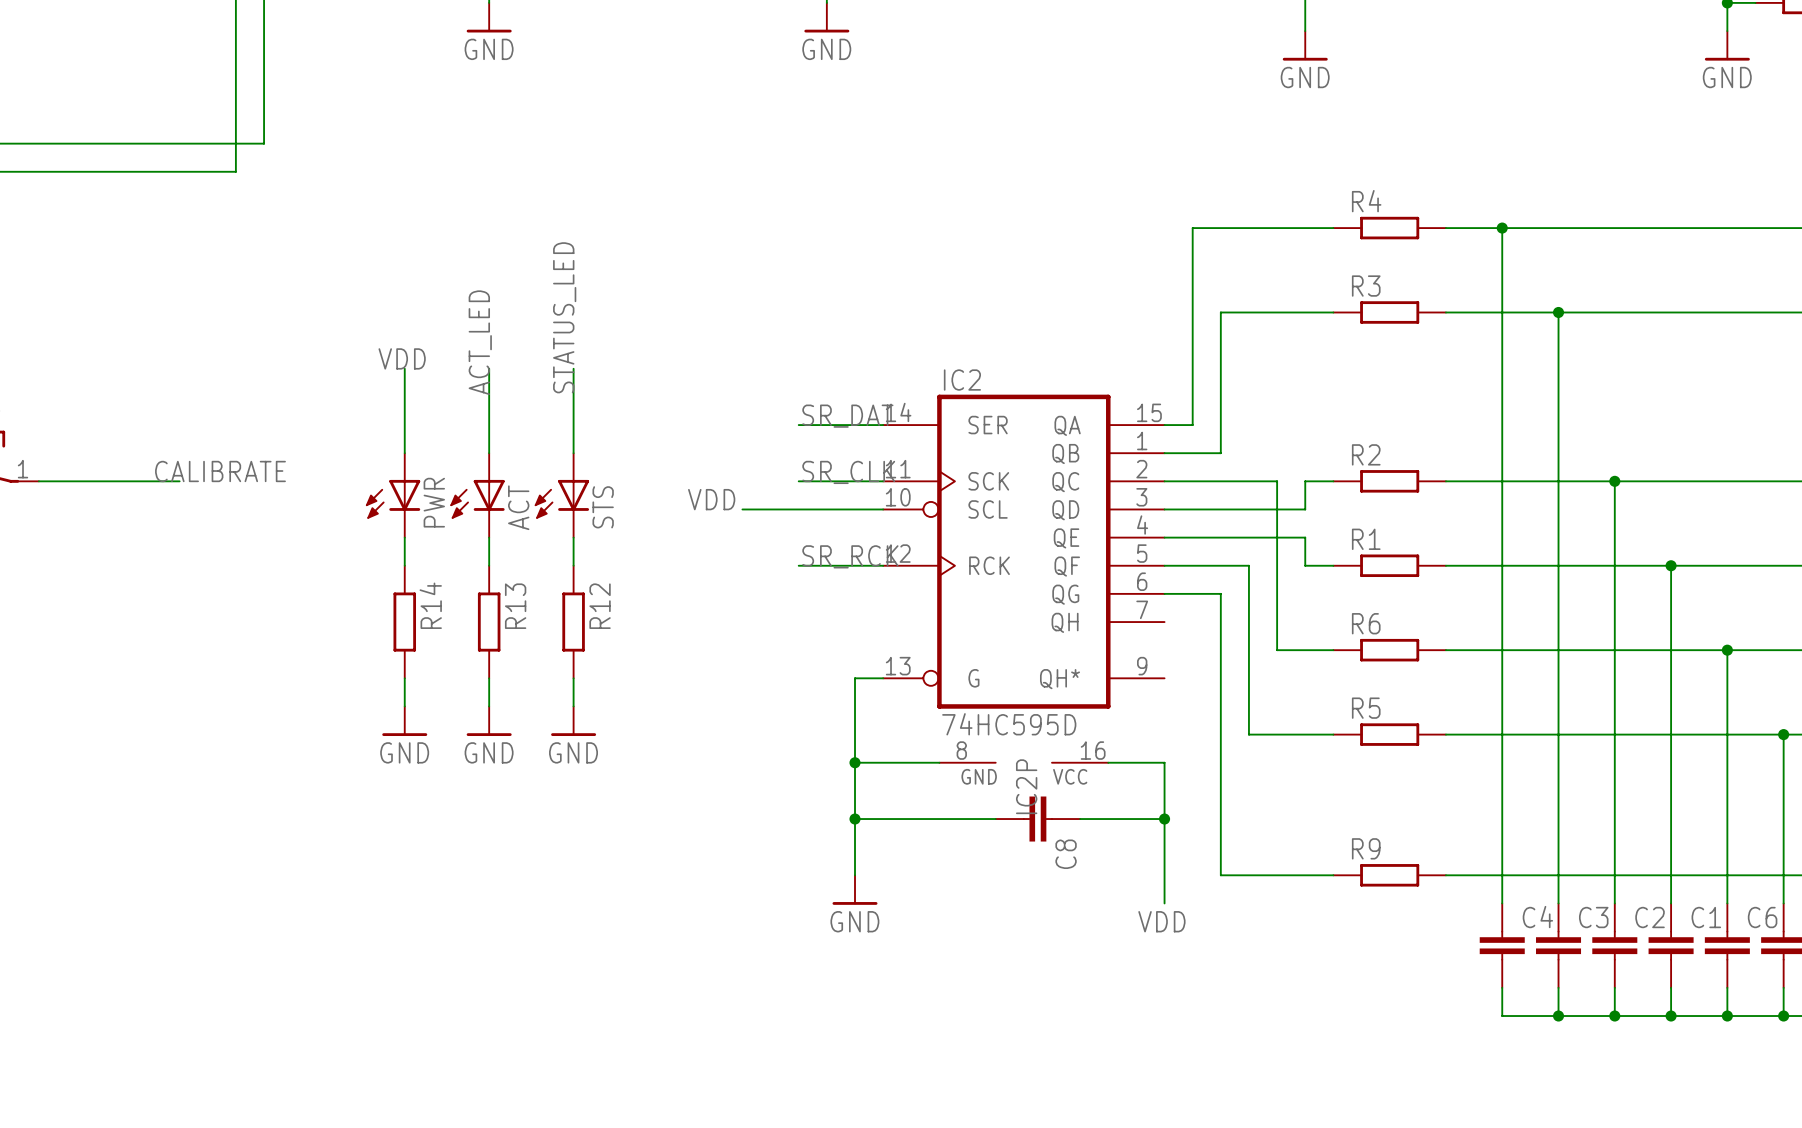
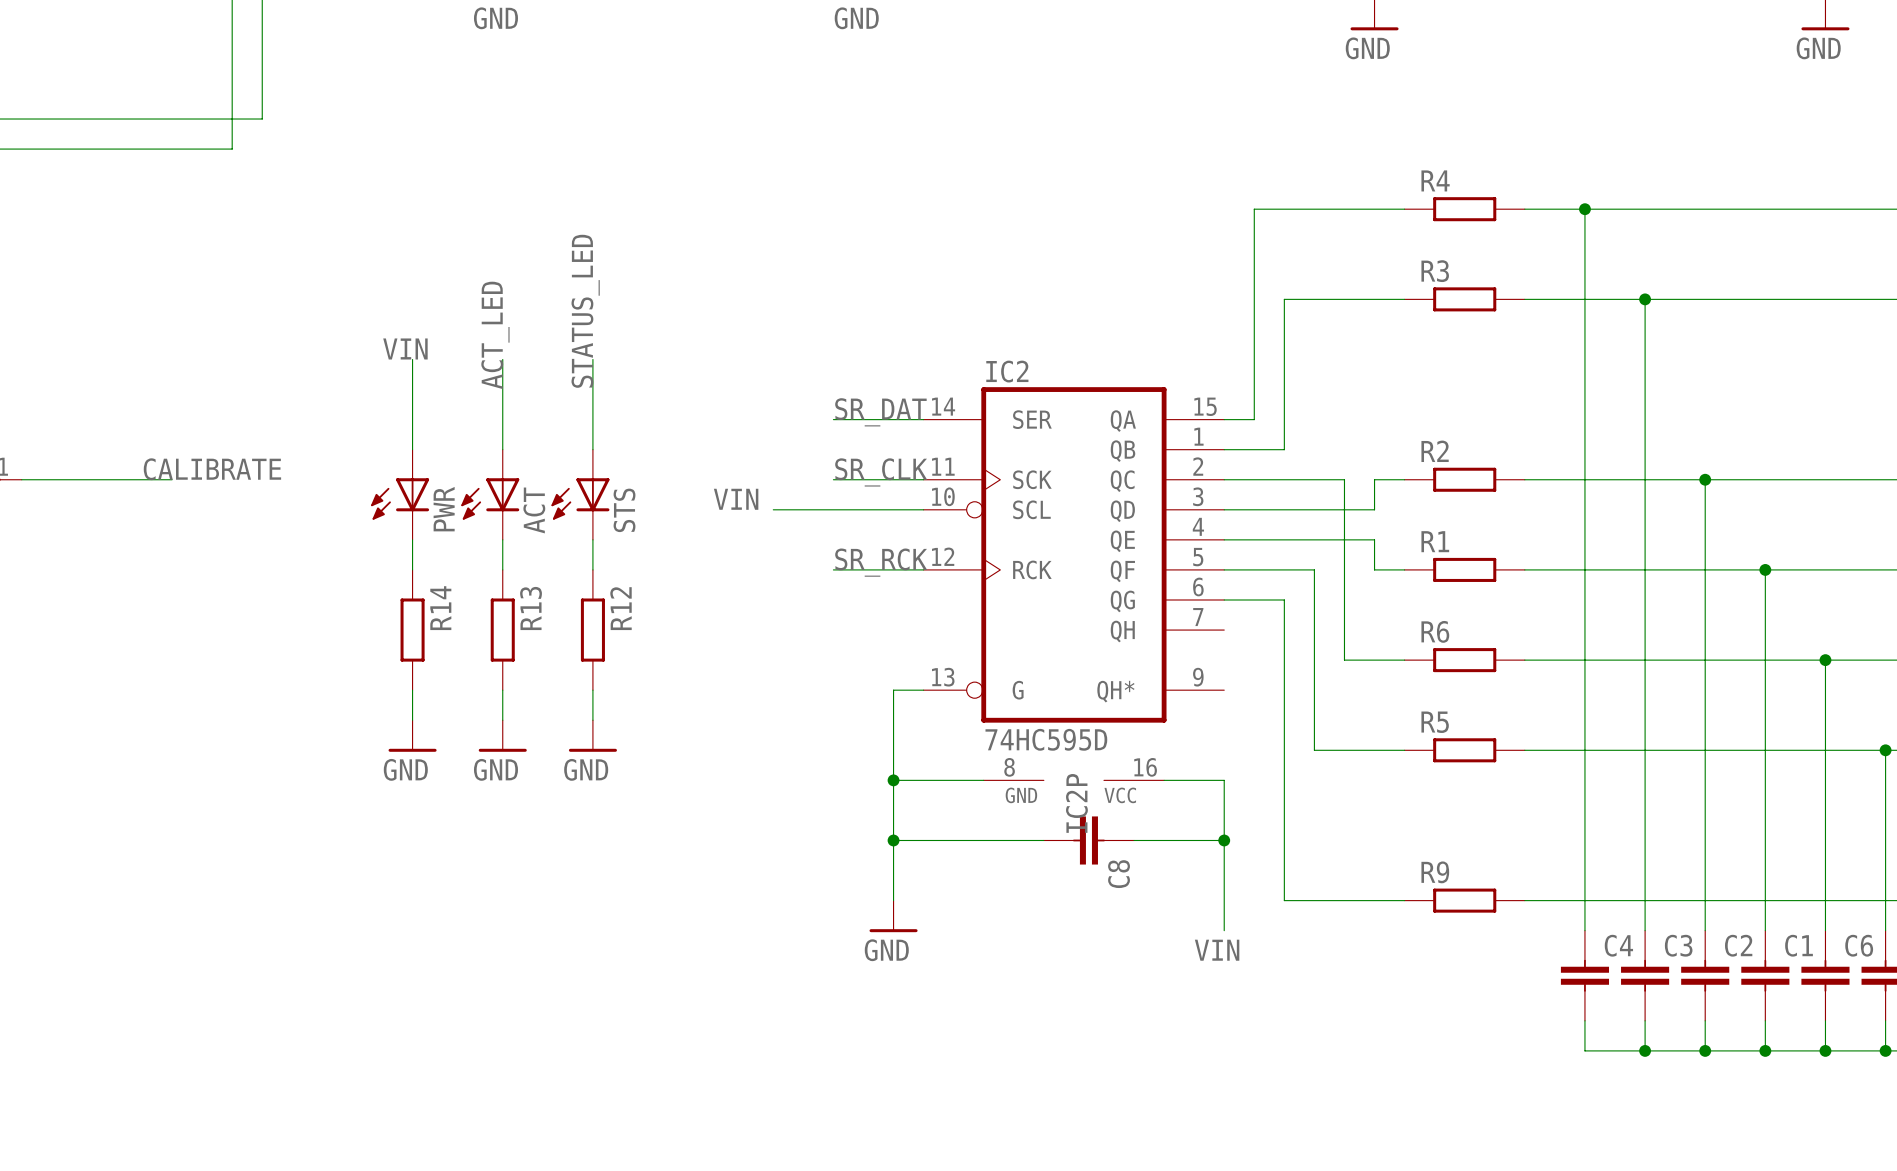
label: VDD (402, 358) -> VIN (405, 348)
label: VDD (711, 499) -> VIN (736, 499)
label: VDD (1161, 921) -> VIN (1217, 950)

